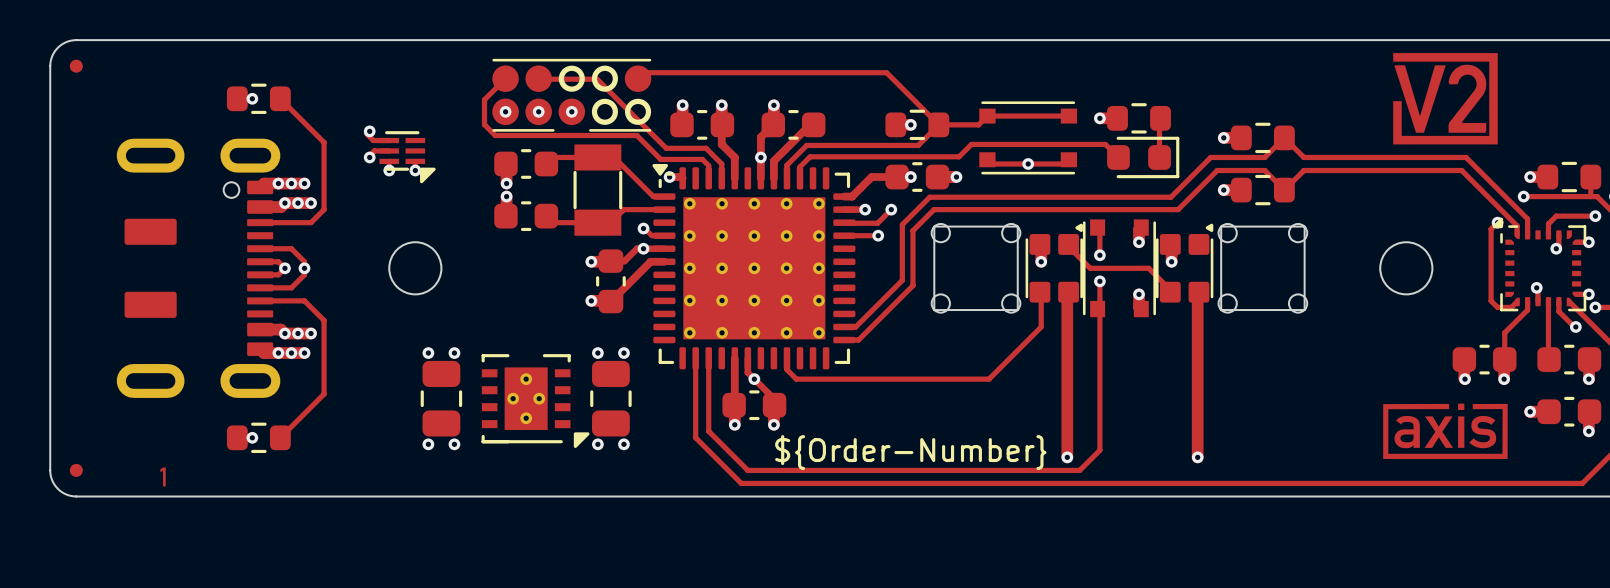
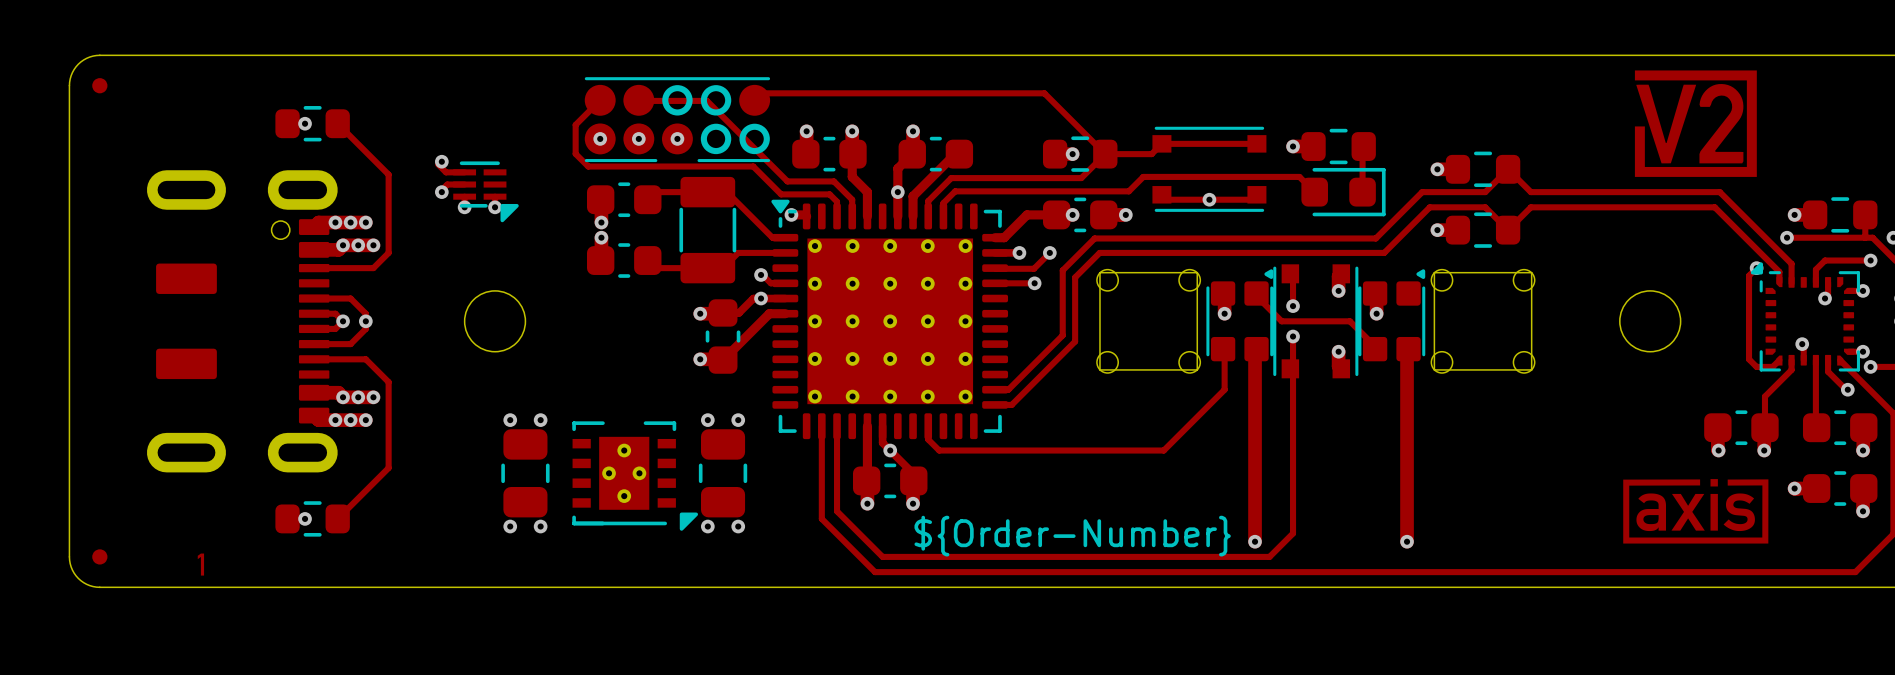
part footprint: [573, 144, 623, 236] -> [679, 176, 737, 284]

